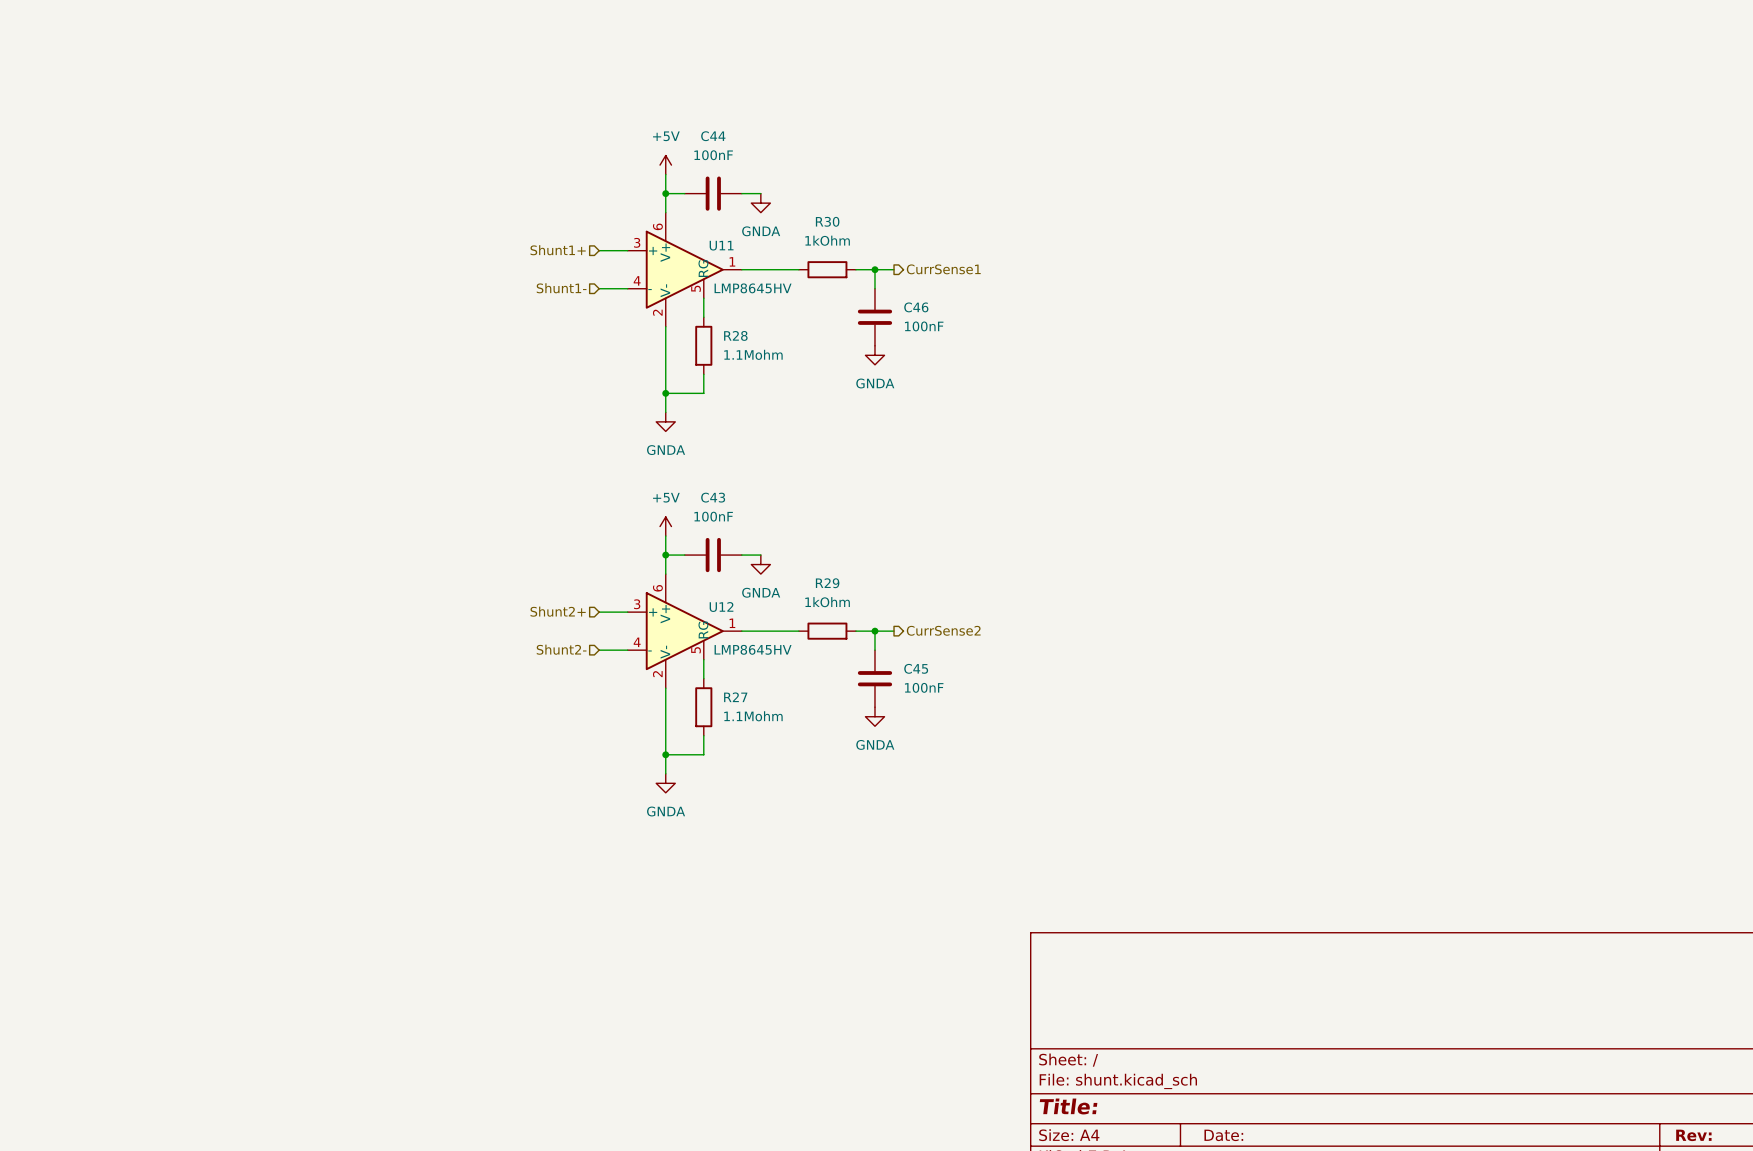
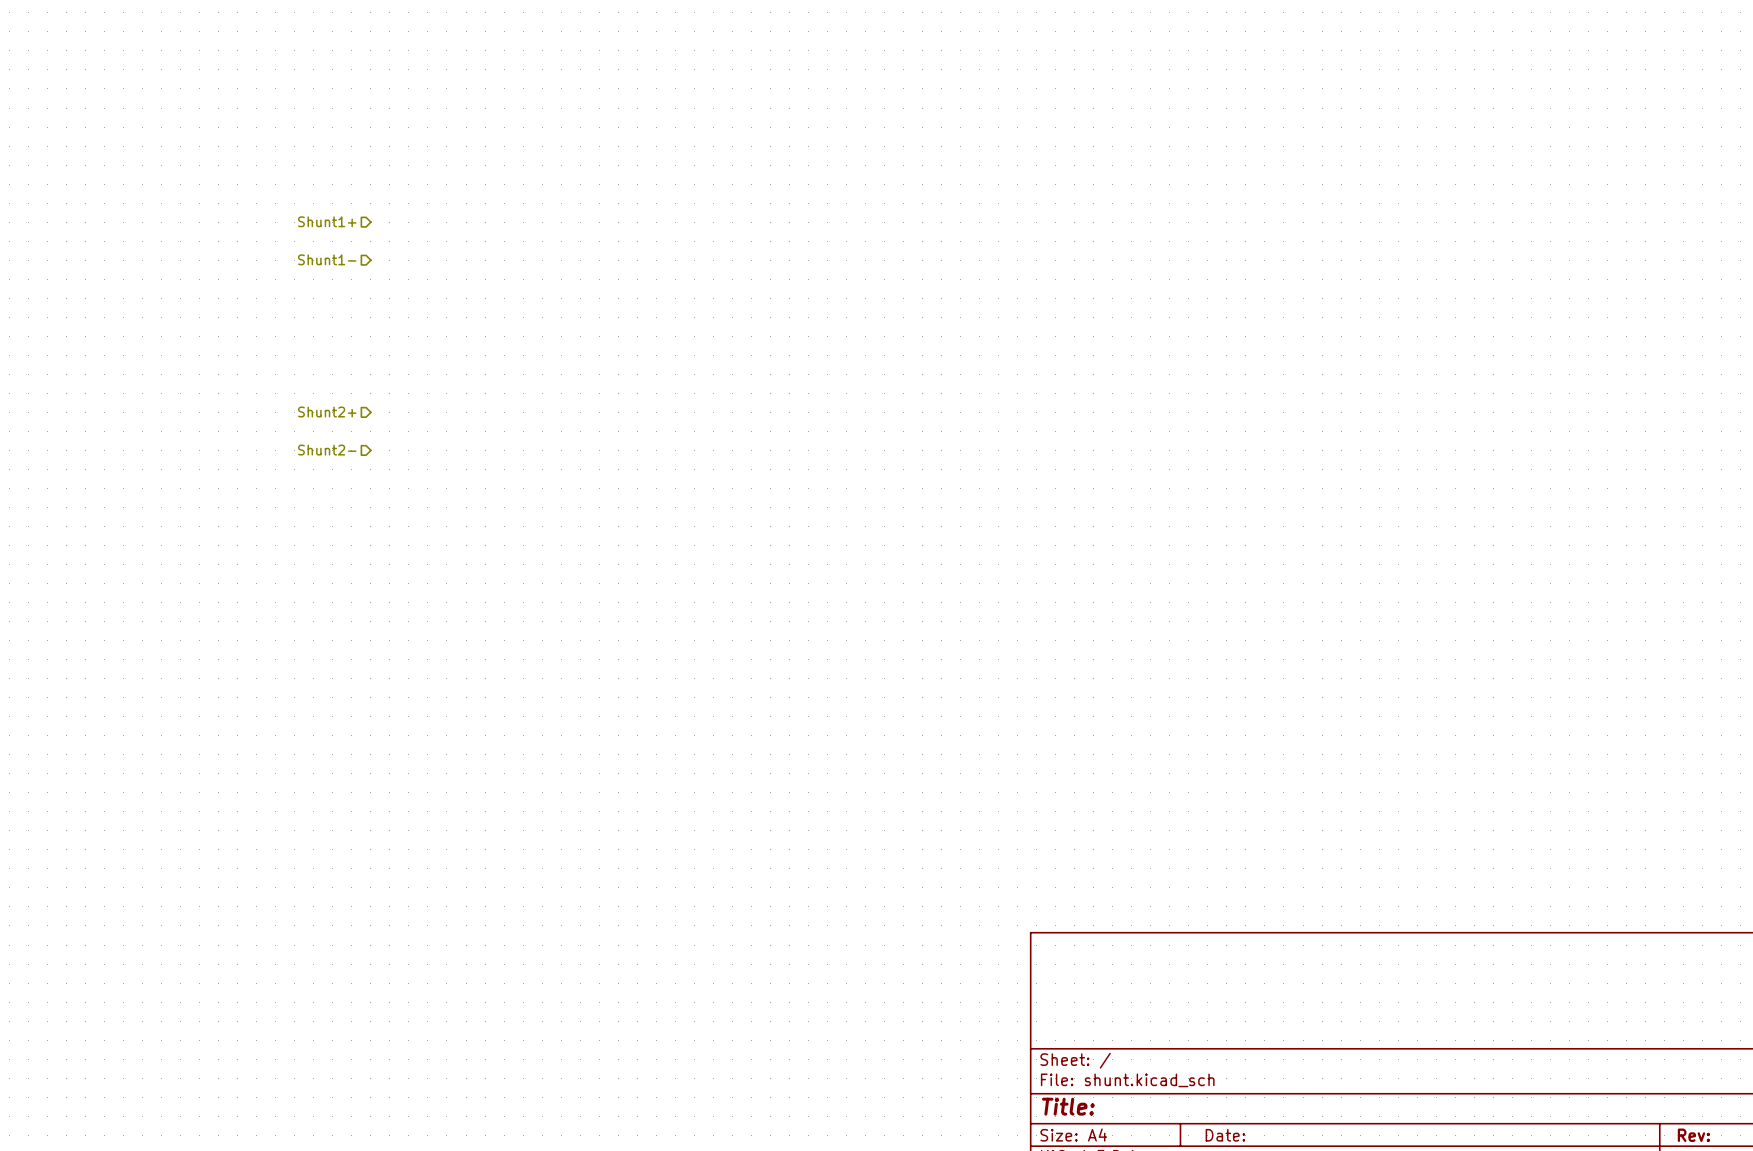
power symbol: +5V (665, 165) -> none
wire: (665, 174) (665, 212) -> none
wire: (665, 193) (684, 193) -> none
junction: (665, 193) -> none
C44: 100nF (713, 193) -> none
wire: (741, 193) (760, 193) -> none
power symbol: GNDA (760, 203) -> none
hierarchical label: none -> Shunt1+ (327, 221)
hierarchical label: Shunt1+ (558, 250) -> none
wire: (599, 250) (627, 250) -> none
hierarchical label: none -> Shunt1- (327, 259)
U11: LMP8645HV (684, 269) -> none
wire: (741, 269) (798, 269) -> none
R30: 1kOhm (827, 269) -> none
wire: (855, 269) (894, 269) -> none
wire: (874, 269) (874, 288) -> none
junction: (874, 269) -> none
hierarchical label: CurrSense1 (943, 269) -> none
hierarchical label: Shunt1- (561, 288) -> none
wire: (599, 288) (627, 288) -> none
wire: (703, 298) (703, 317) -> none
C46: 100nF (874, 317) -> none
wire: (665, 326) (665, 412) -> none
R28: 1.1Mohm (703, 345) -> none
power symbol: GNDA (874, 355) -> none
wire: (703, 374) (703, 393) (665, 393) -> none
junction: (665, 393) -> none
hierarchical label: none -> Shunt2+ (327, 412)
power symbol: GNDA (665, 421) -> none
hierarchical label: none -> Shunt2- (327, 450)
power symbol: +5V (665, 526) -> none
wire: (665, 536) (665, 574) -> none
wire: (665, 555) (684, 555) -> none
junction: (665, 555) -> none
C43: 100nF (713, 555) -> none
wire: (741, 555) (760, 555) -> none
power symbol: GNDA (760, 564) -> none
hierarchical label: Shunt2+ (558, 611) -> none
wire: (599, 612) (627, 612) -> none
hierarchical label: CurrSense2 (943, 630) -> none
U12: LMP8645HV (684, 631) -> none
wire: (741, 631) (798, 631) -> none
R29: 1kOhm (827, 631) -> none
wire: (855, 631) (894, 631) -> none
wire: (874, 631) (874, 650) -> none
junction: (874, 631) -> none
hierarchical label: Shunt2- (561, 649) -> none
wire: (599, 650) (627, 650) -> none
wire: (703, 659) (703, 678) -> none
C45: 100nF (874, 678) -> none
wire: (665, 688) (665, 773) -> none
R27: 1.1Mohm (703, 707) -> none
power symbol: GNDA (874, 716) -> none
wire: (703, 735) (703, 754) (665, 754) -> none
junction: (665, 754) -> none
power symbol: GNDA (665, 783) -> none

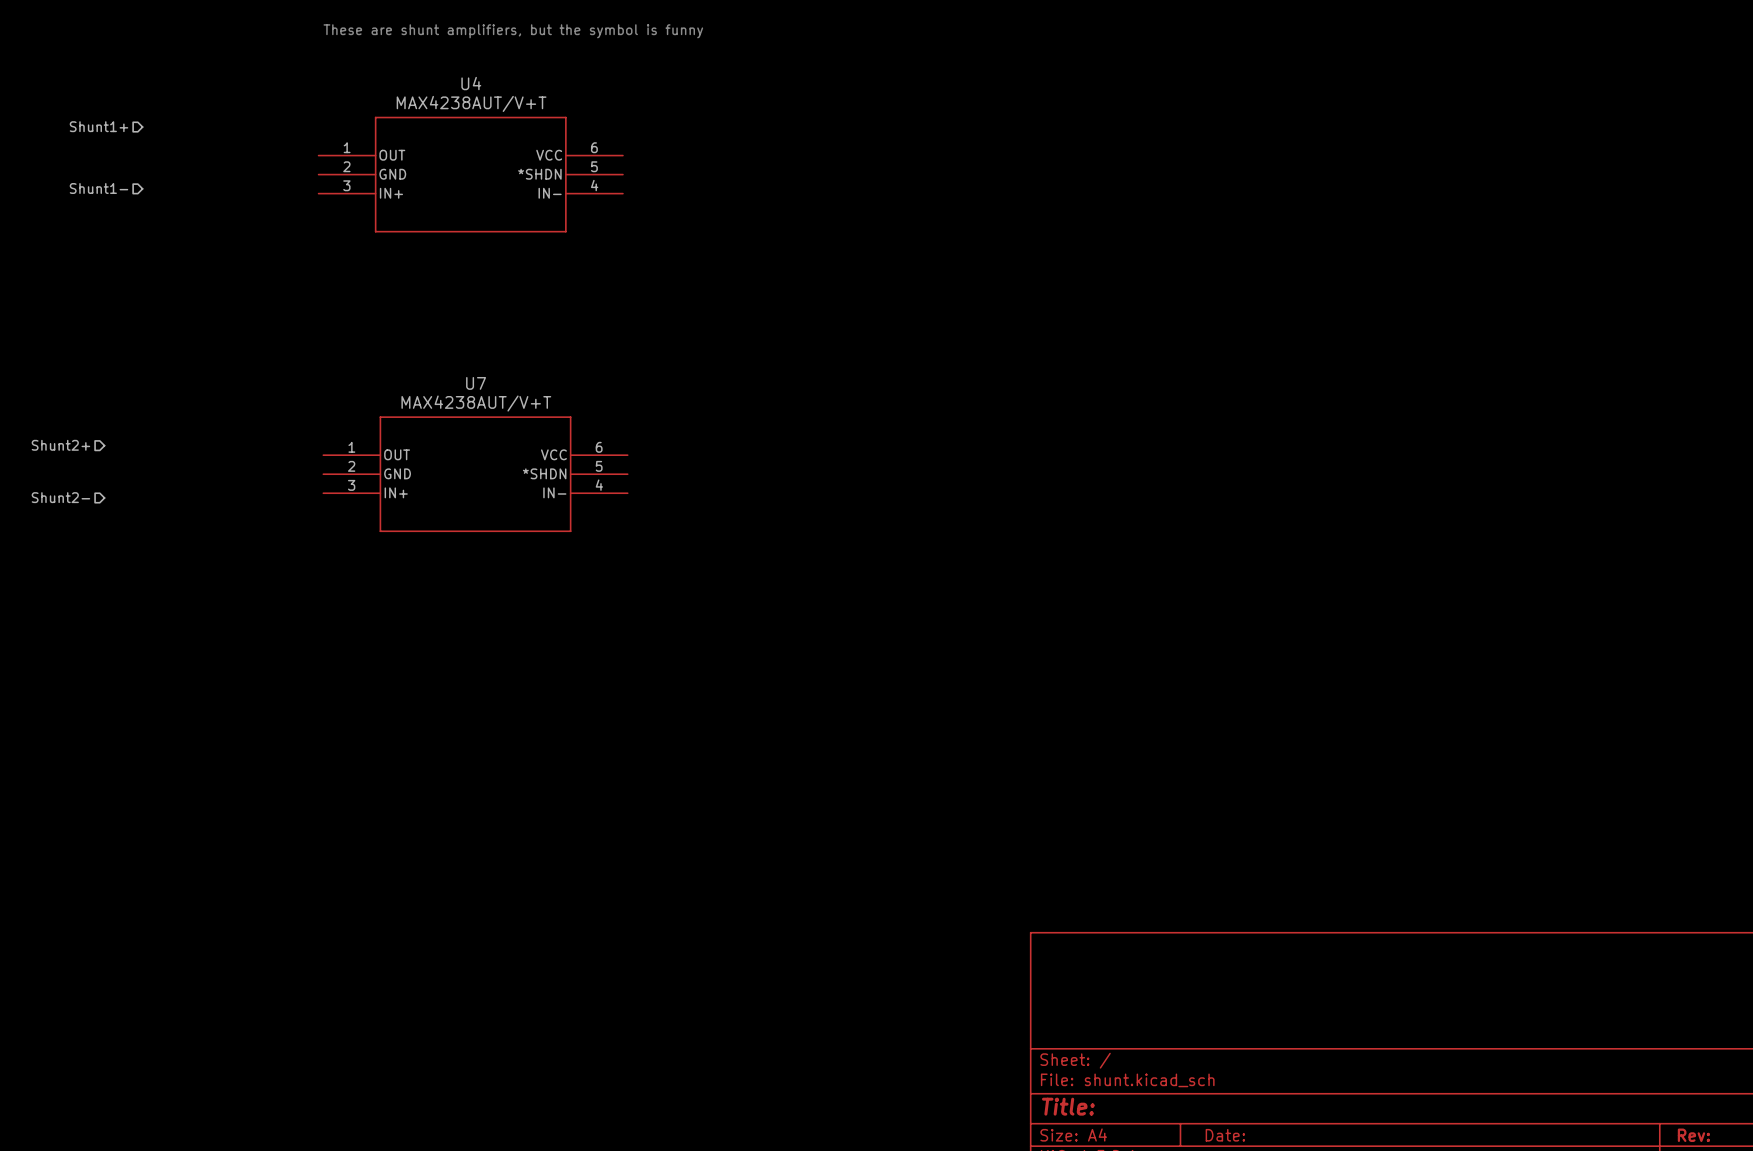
text: none -> These are shunt amplifiers, but the symbol is funny (513, 31)
hierarchical label: none -> Shunt1+ (98, 126)
U4: none -> MAX4238AUT/V+T (470, 174)
hierarchical label: none -> Shunt1- (98, 188)
hierarchical label: Shunt1+ (327, 221) -> none
hierarchical label: Shunt1- (327, 259) -> none
hierarchical label: Shunt2+ (327, 412) -> none
hierarchical label: none -> Shunt2+ (60, 445)
hierarchical label: Shunt2- (327, 450) -> none
U7: none -> MAX4238AUT/V+T (475, 474)
hierarchical label: none -> Shunt2- (60, 497)

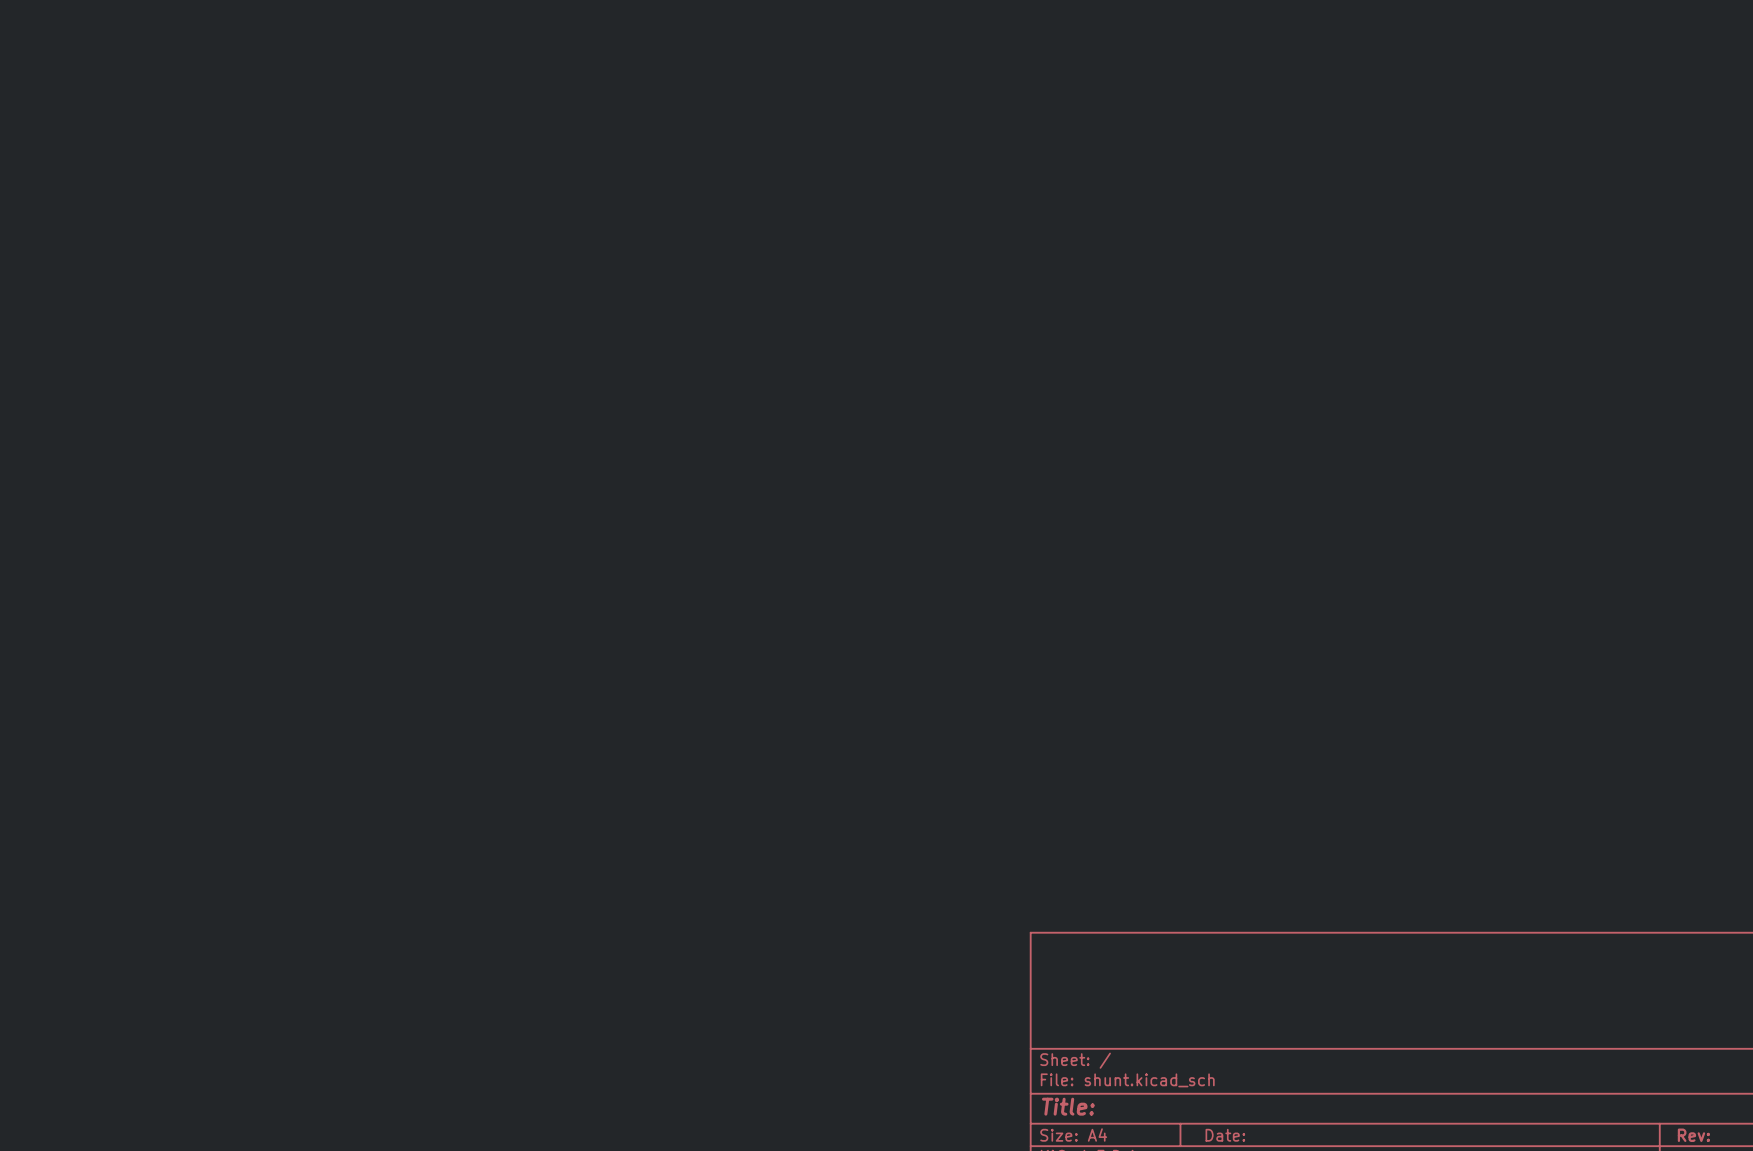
text: These are shunt amplifiers, but the symbol is funny (513, 31) -> none
hierarchical label: Shunt1+ (98, 126) -> none
U4: MAX4238AUT/V+T (470, 174) -> none
hierarchical label: Shunt1- (98, 188) -> none
hierarchical label: Shunt2+ (60, 445) -> none
U7: MAX4238AUT/V+T (475, 474) -> none
hierarchical label: Shunt2- (60, 497) -> none

